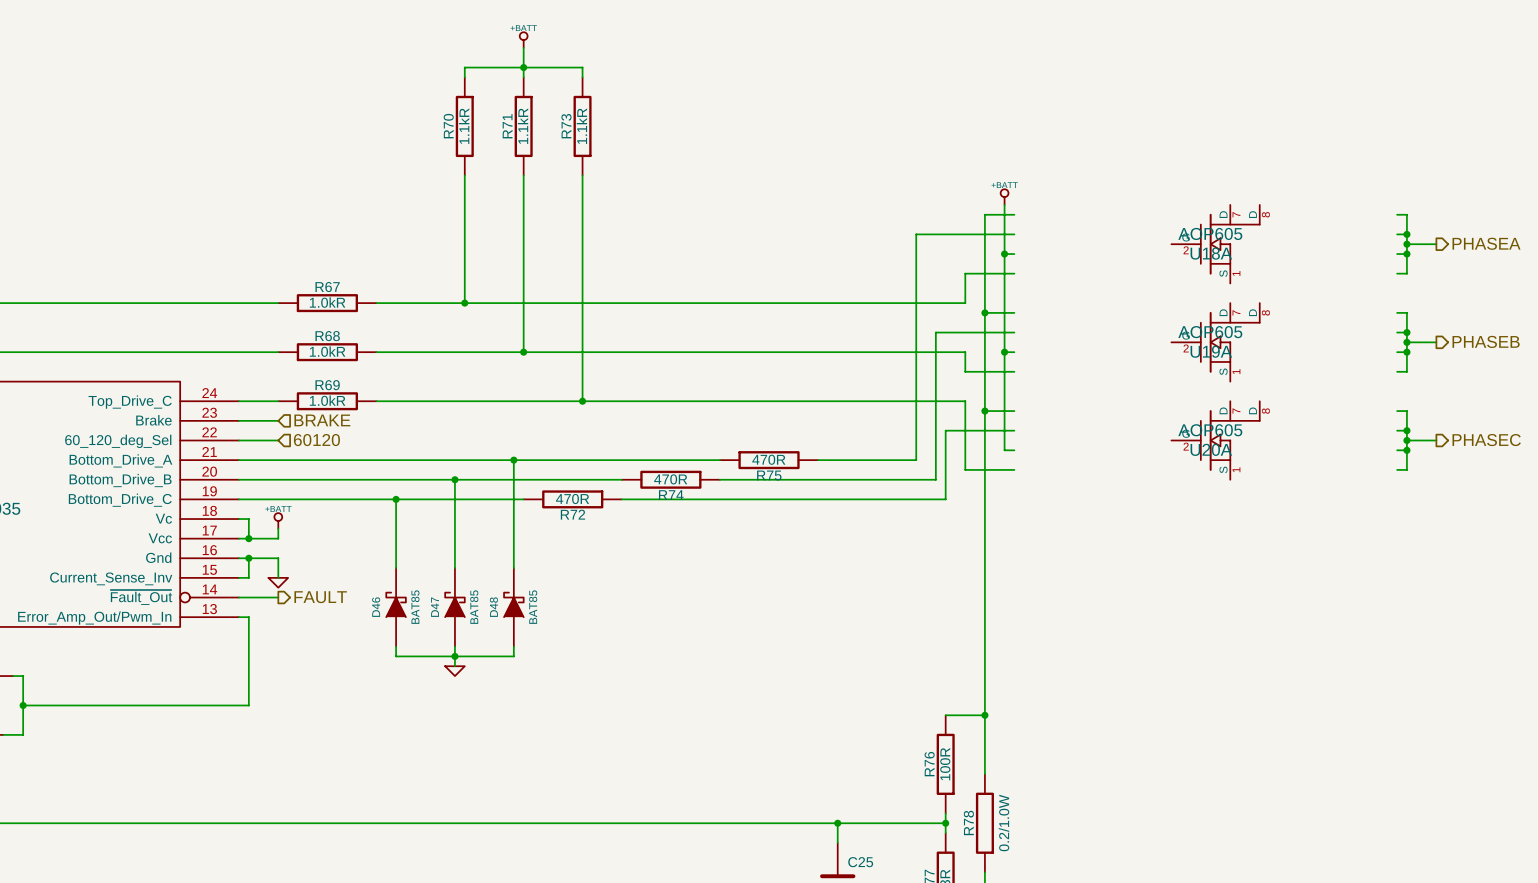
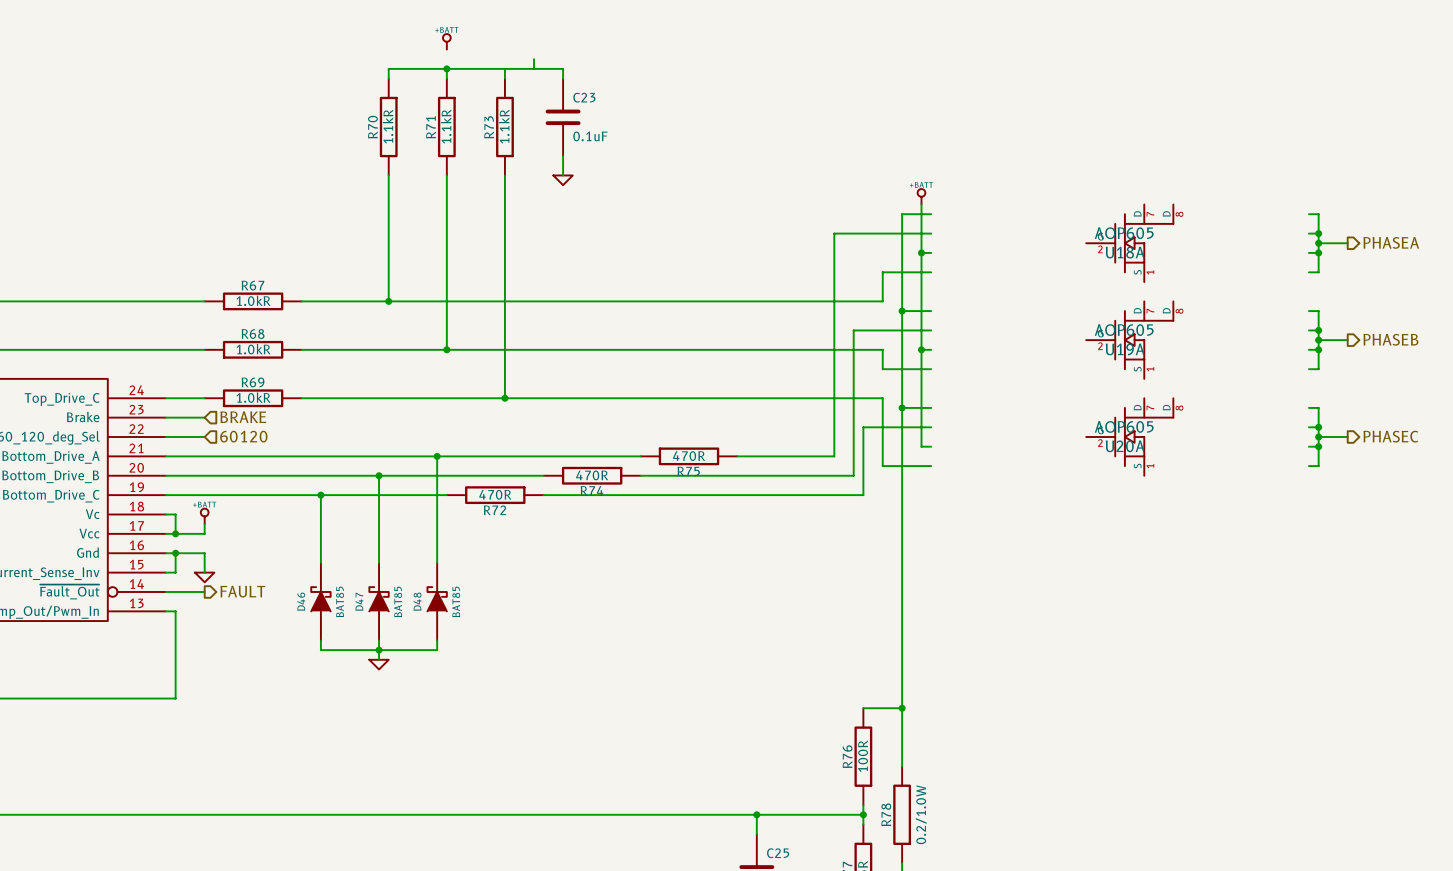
wire: (523, 47) (523, 67) -> (563, 156) (563, 175)
wire: none -> (534, 59) (534, 68)
wire: none -> (504, 68) (563, 68) (563, 78)
C23: none -> 0.1uF (563, 117)
power symbol: none -> (563, 180)

